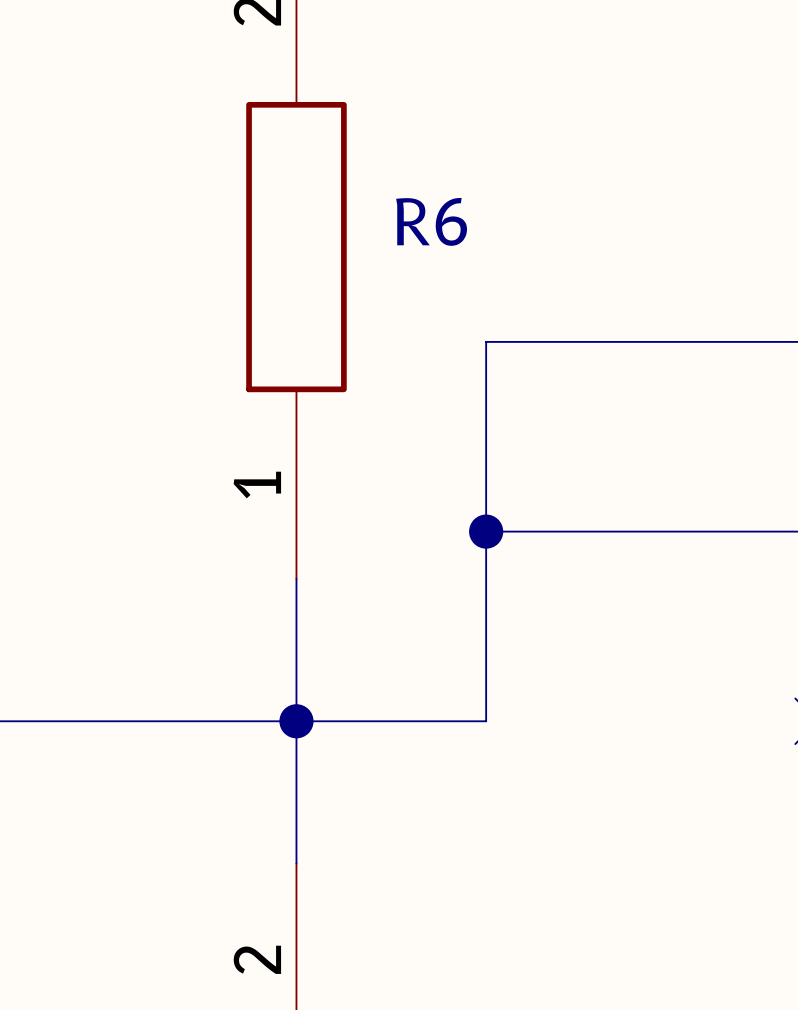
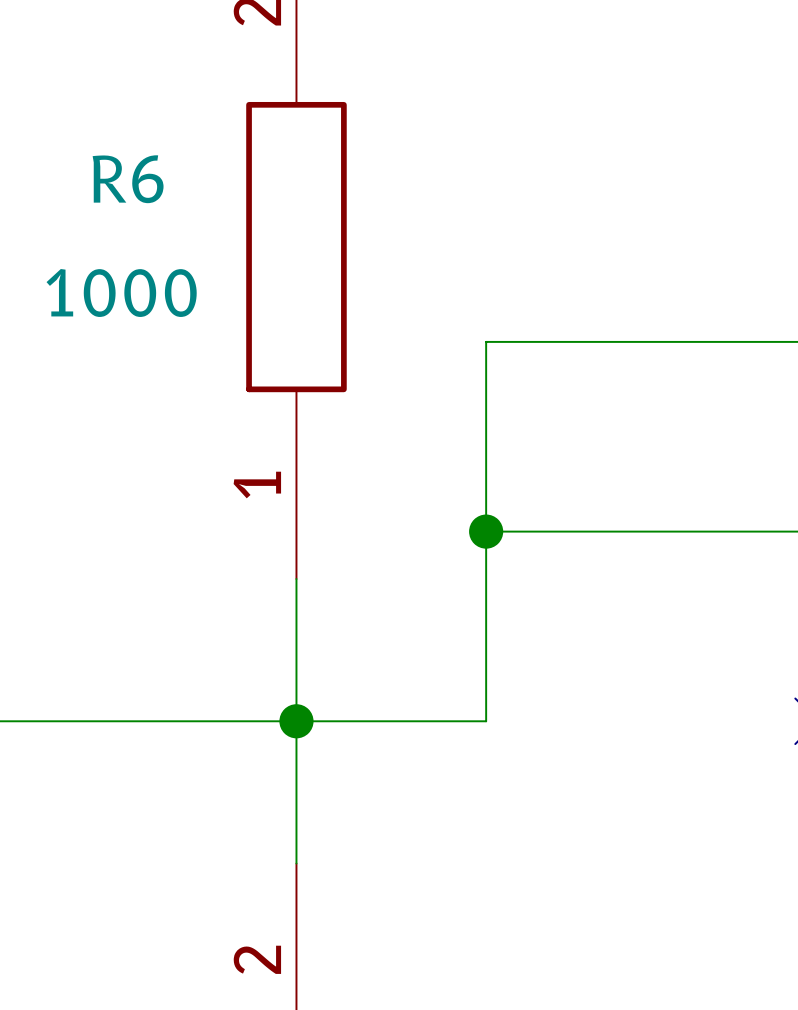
R6 name position: R6 (431, 221) -> R6 (128, 179)
R6 value: none -> 1000 (121, 292)

